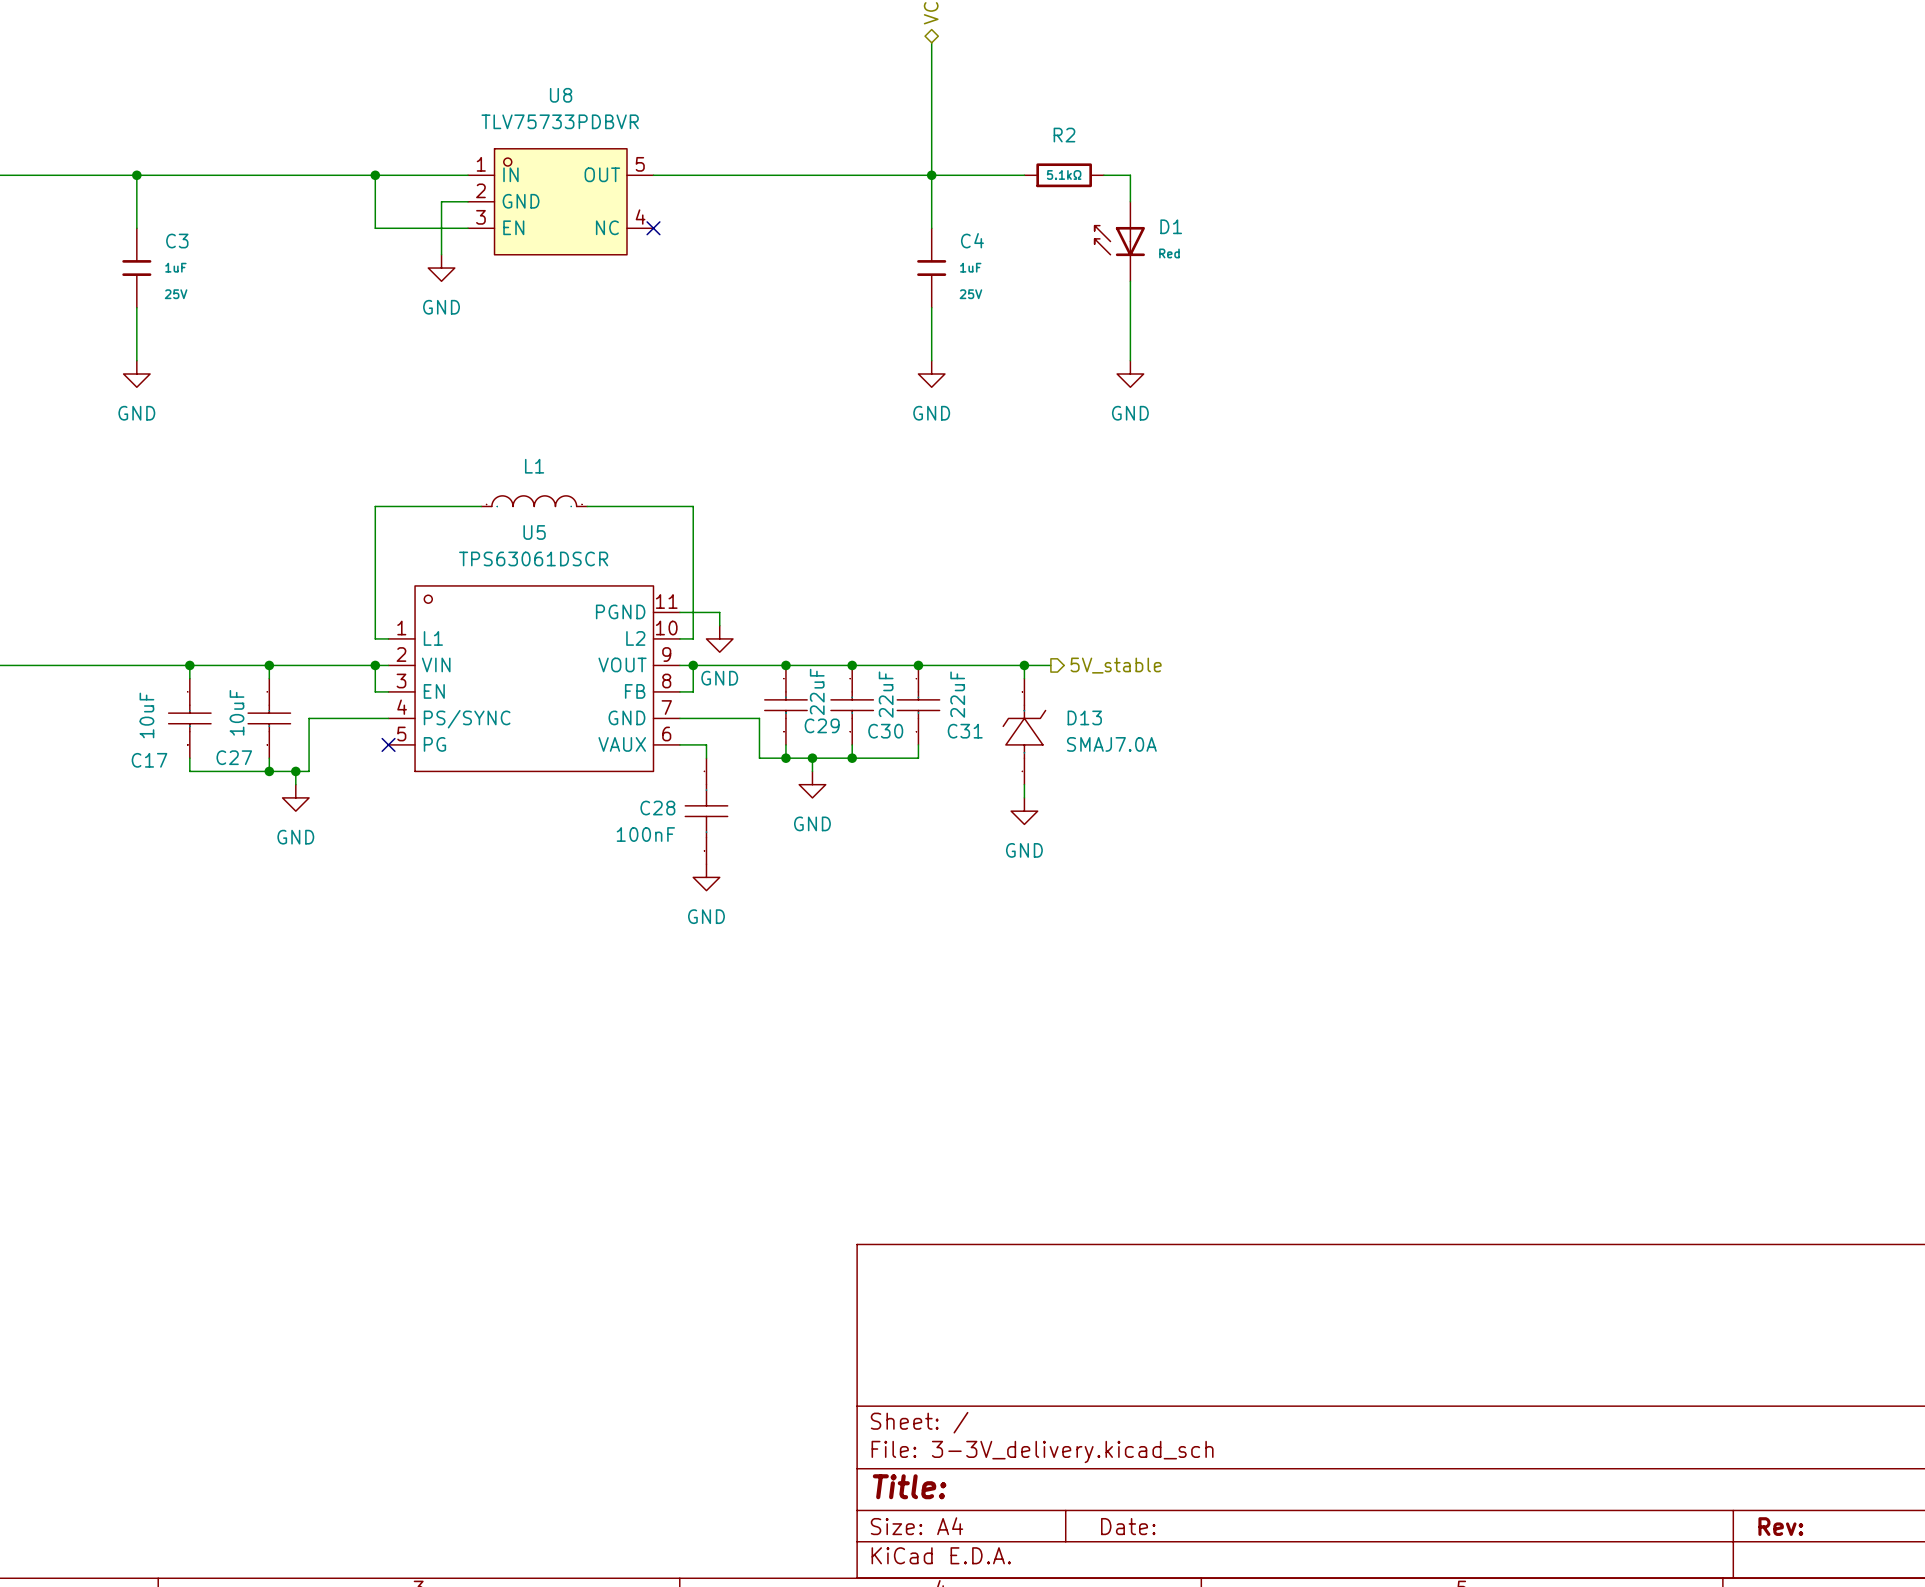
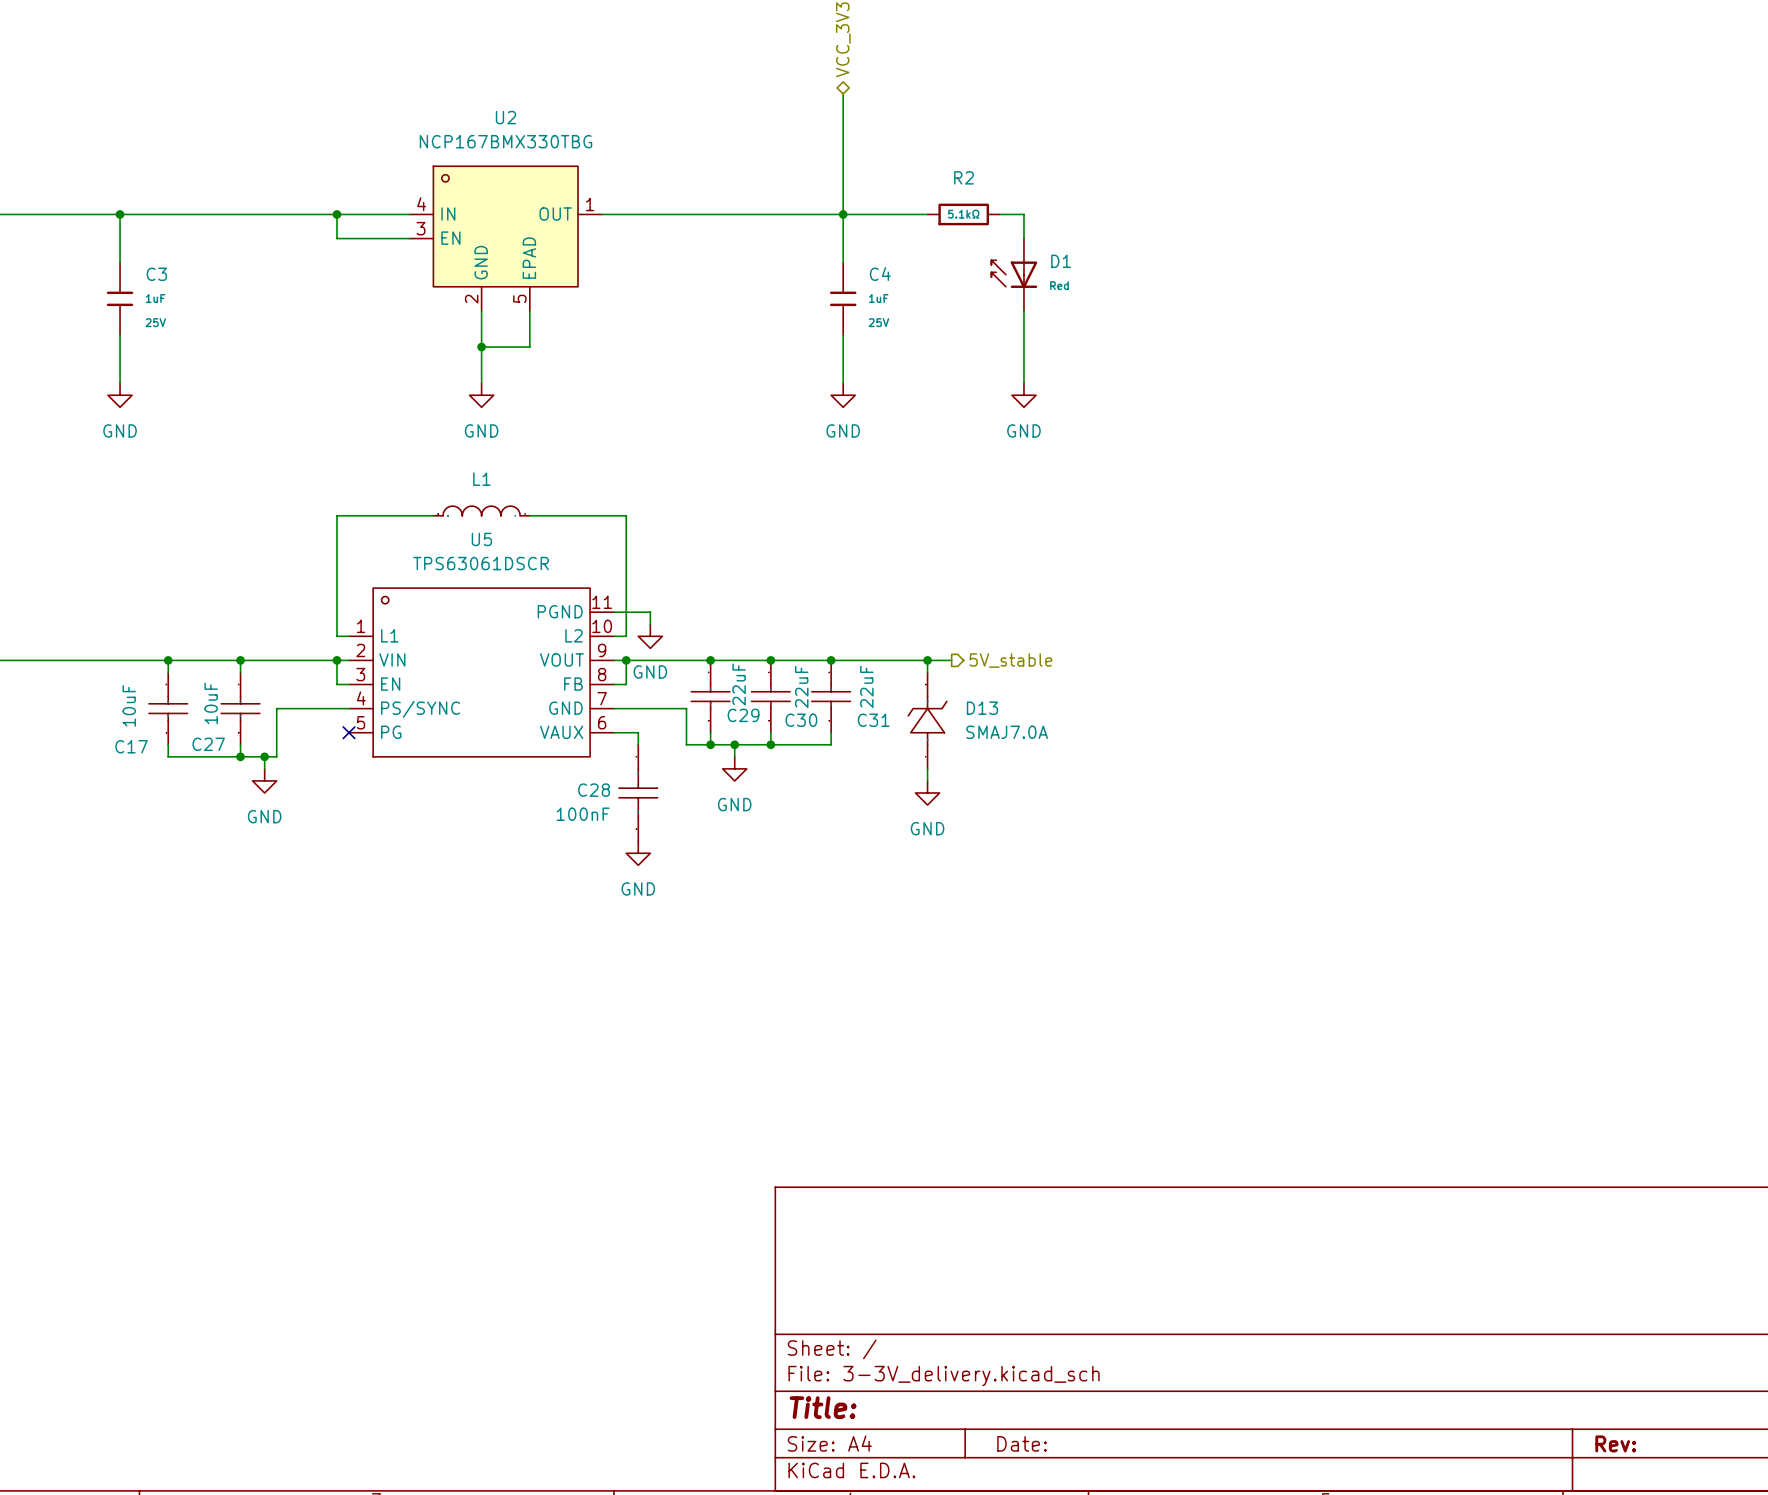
wire: (375, 201) (375, 228) (468, 228) -> (336, 238) (397, 238)
wire: (441, 201) (441, 254) -> none
U8: TLV75733PDBVR (560, 201) -> none
U2: none -> NCP167BMX330TBG (505, 238)
no-connect mark: (653, 228) -> none
power symbol position: GND (441, 268) -> GND (481, 395)
wire: none -> (481, 310) (481, 383)
wire: none -> (529, 310) (529, 347) (481, 347)
junction: none -> (481, 347)

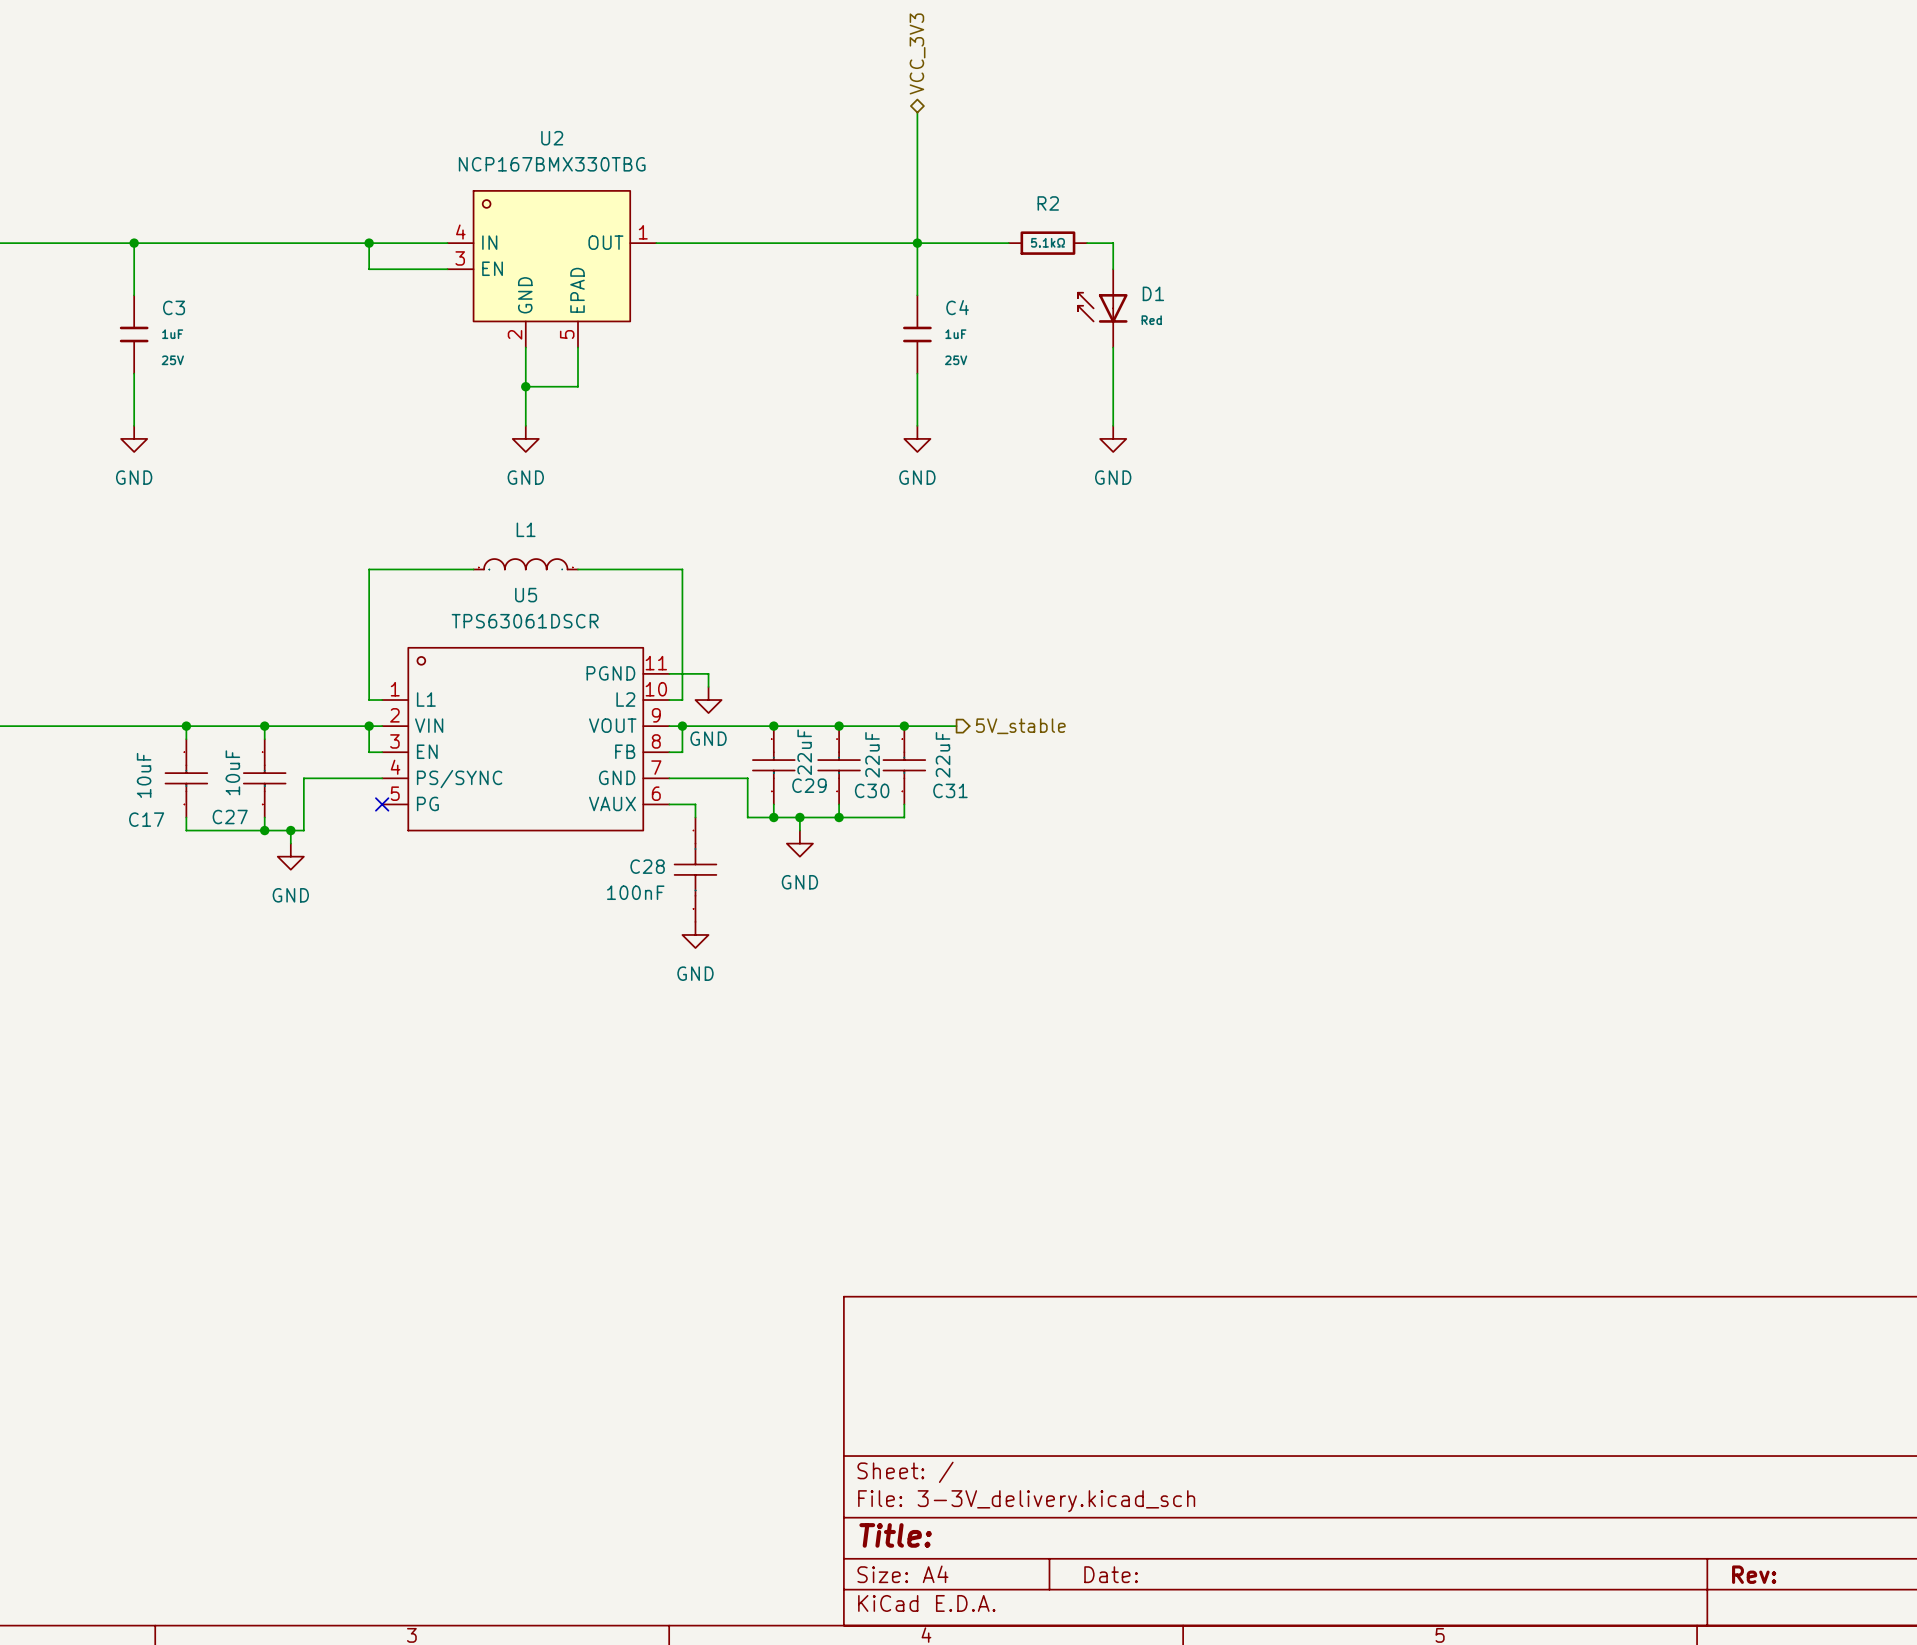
wire: (879, 660) (951, 660) -> none
wire: (927, 660) (927, 672) -> none
junction: (927, 660) -> none
hierarchical label position: 5V_stable (1010, 660) -> 5V_stable (1020, 726)
D13: SMAJ7.0A (927, 720) -> none
wire: (927, 768) (927, 780) -> none
power symbol: GND (927, 792) -> none

